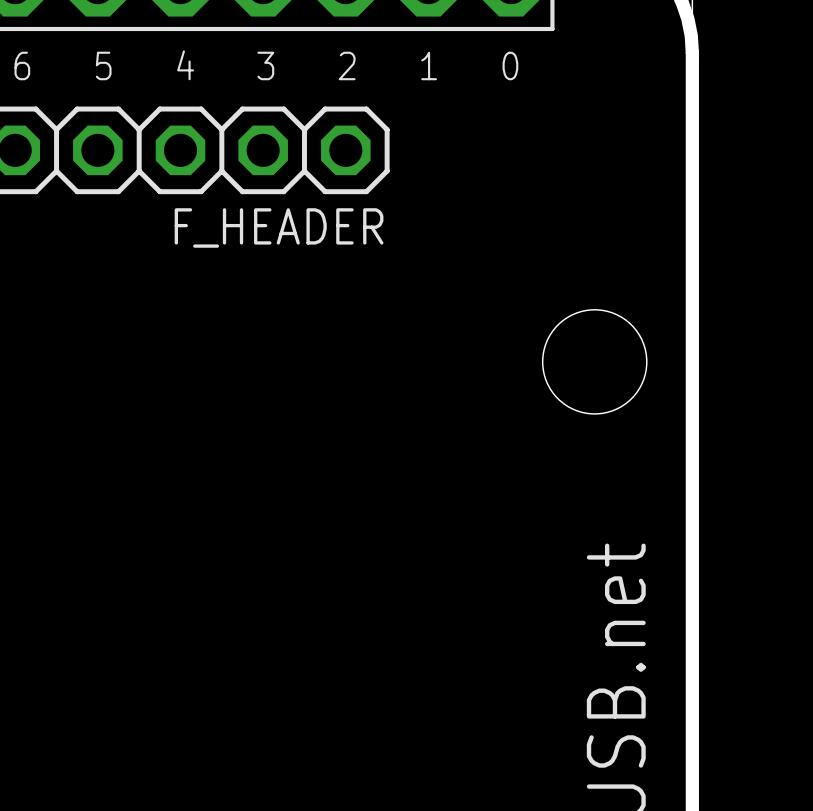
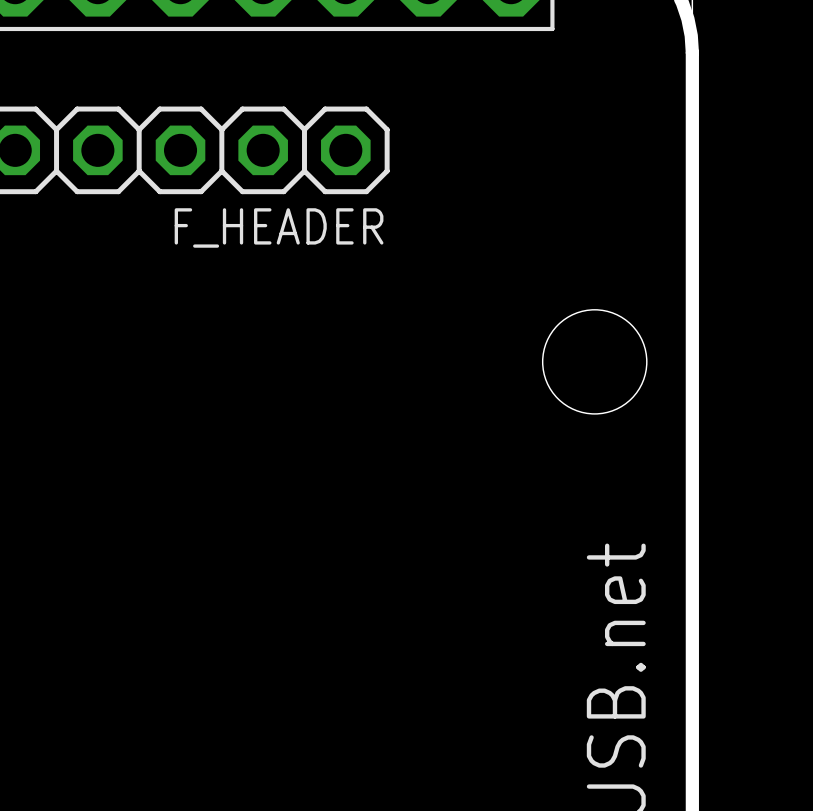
text: 6 (22, 65) -> none
text: 5 (103, 65) -> none
text: 4 (185, 65) -> none
text: 3 (265, 65) -> none
text: 2 (347, 65) -> none
text: 1 (429, 65) -> none
text: 0 (510, 65) -> none

